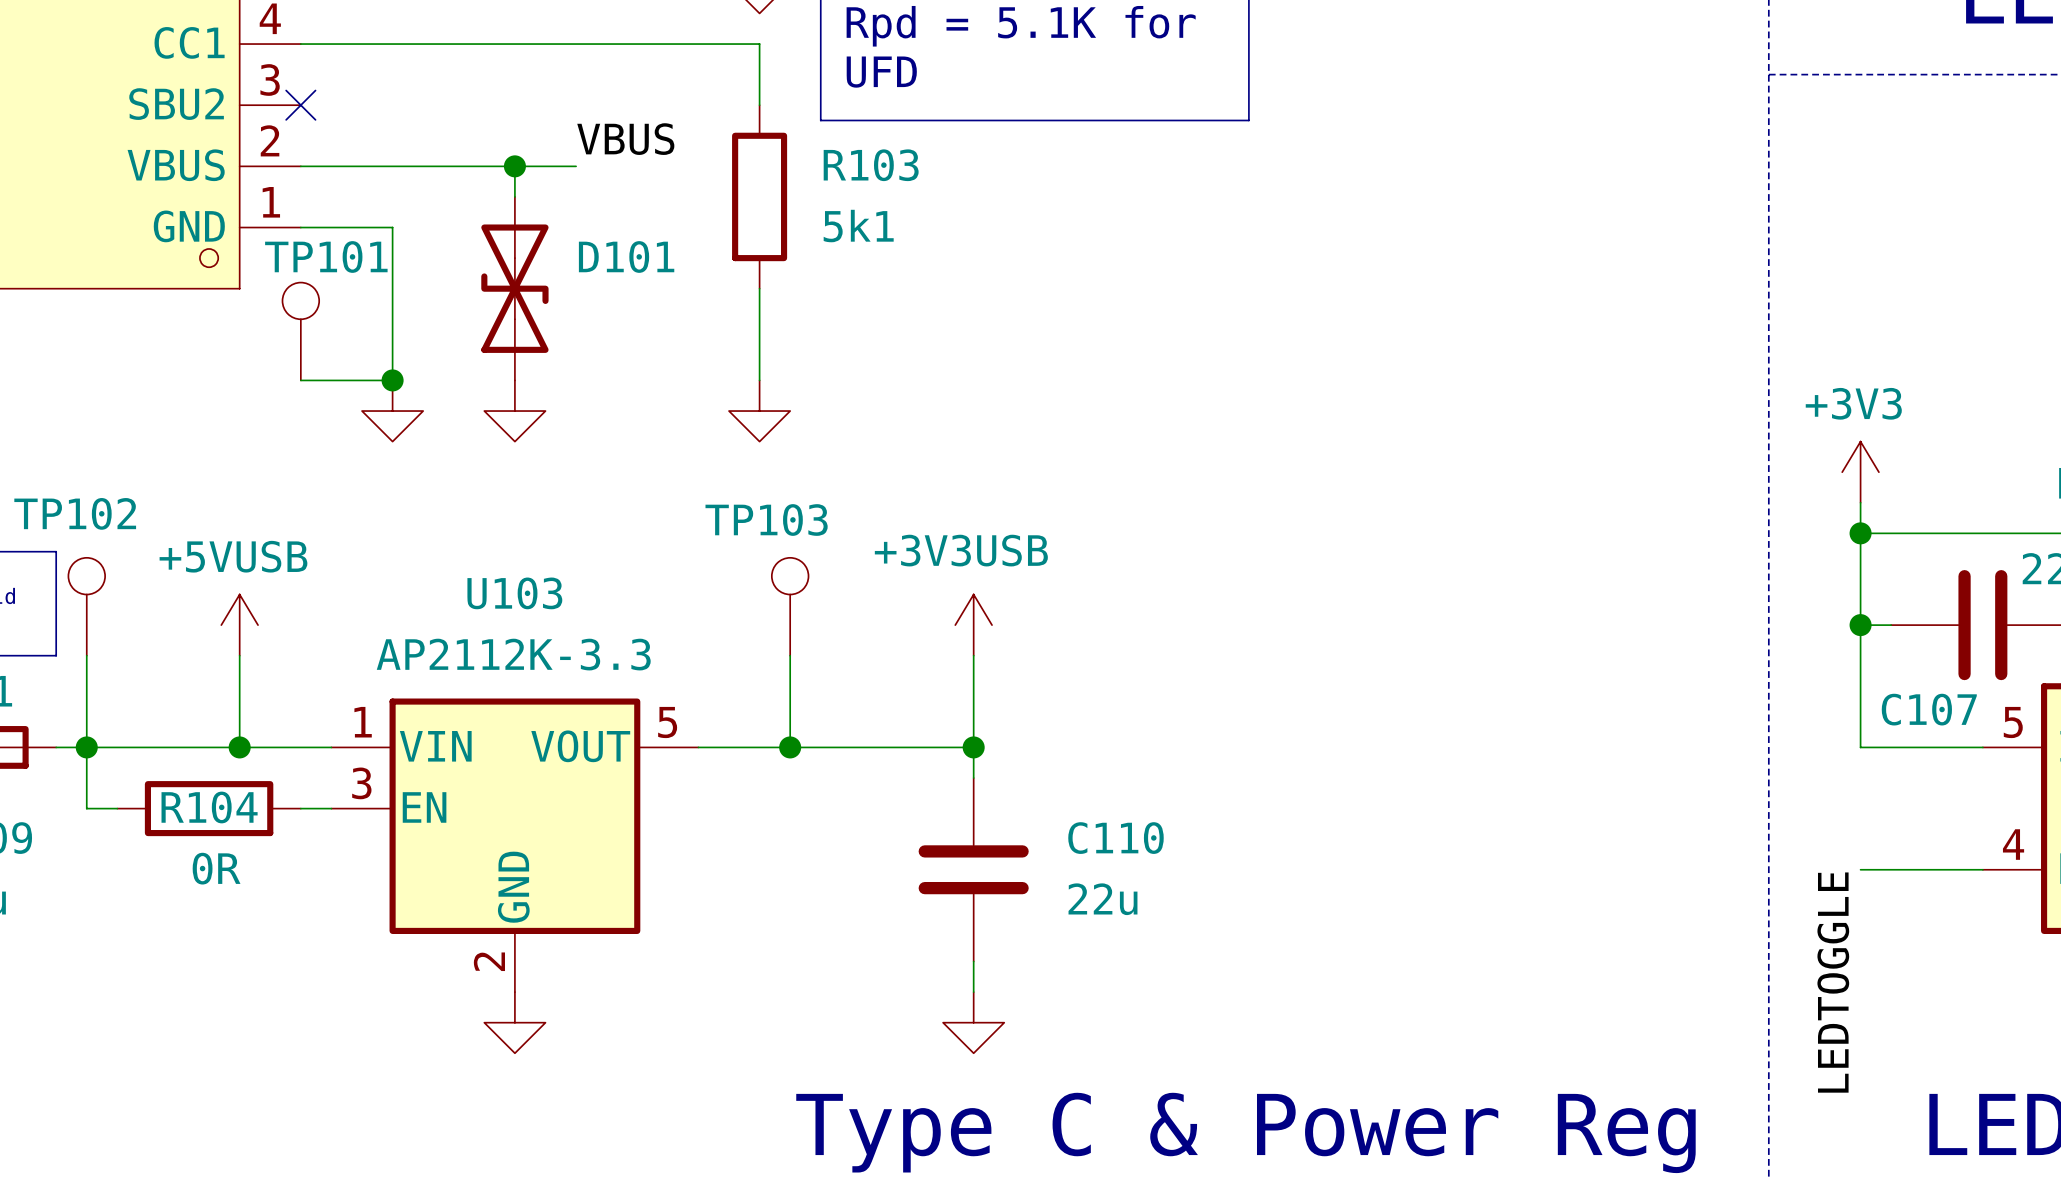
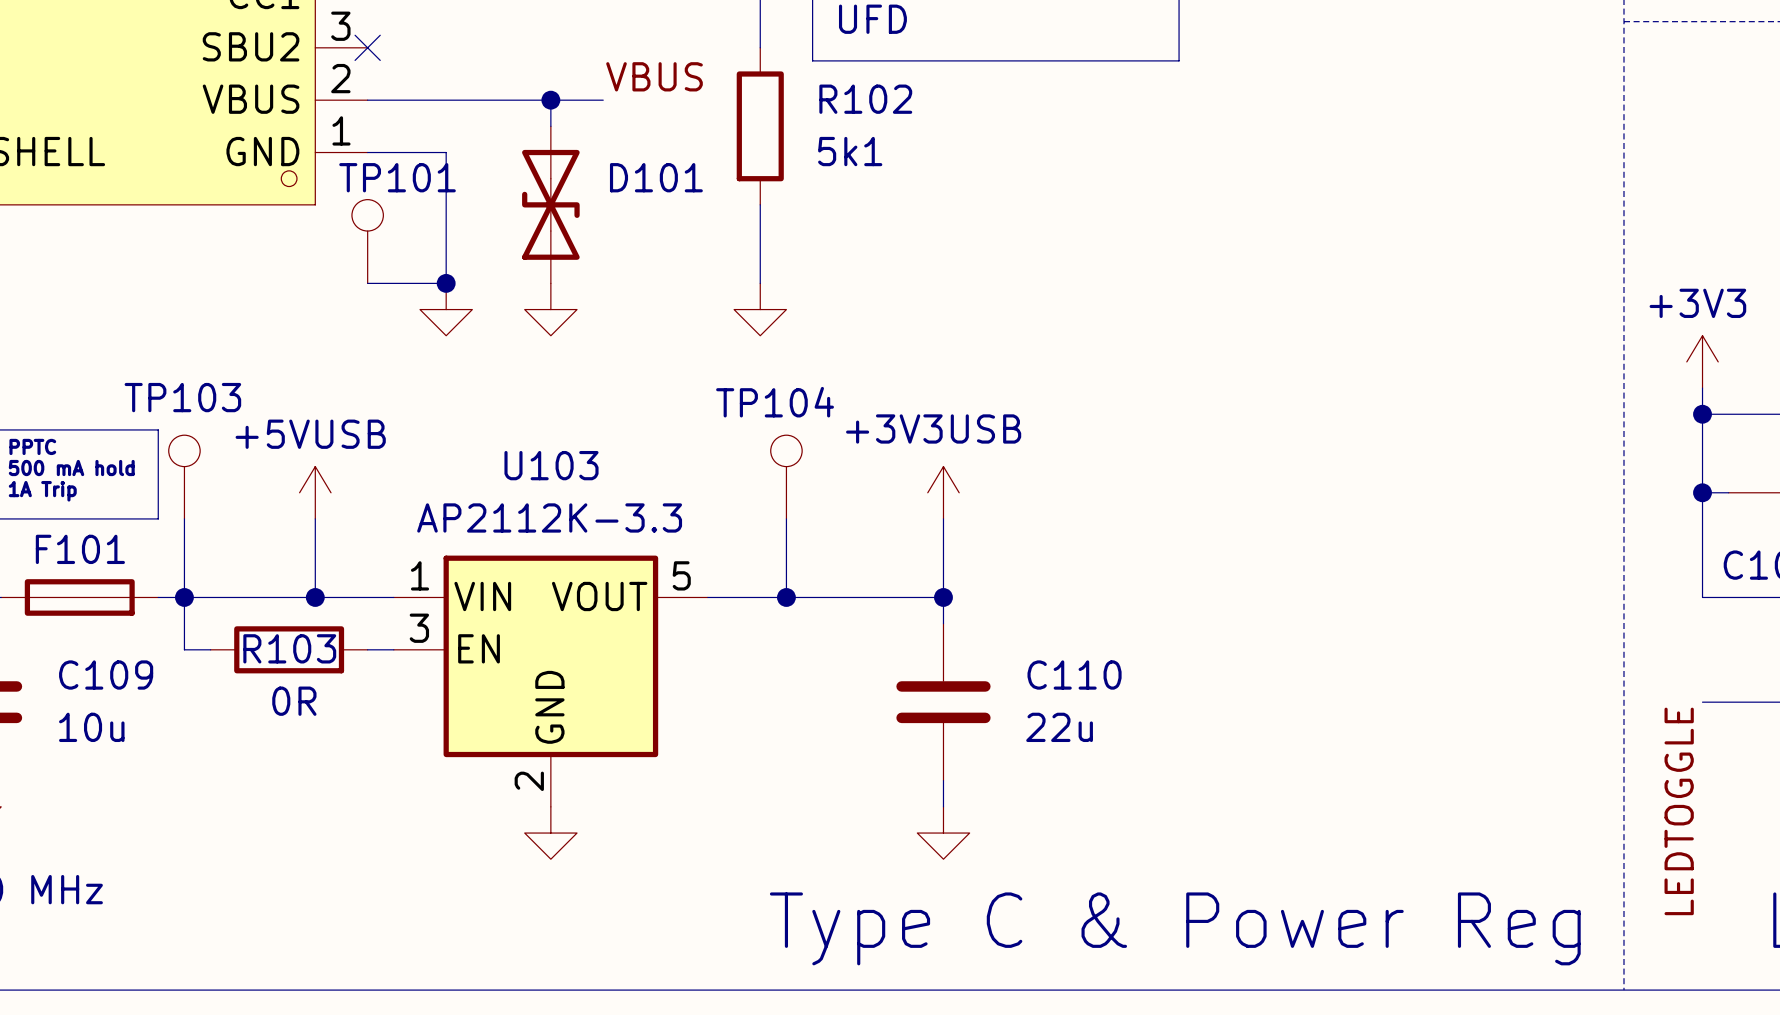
R103 name: R103 (871, 165) -> R102 (865, 99)
TP102 name: TP102 (75, 513) -> TP103 (182, 397)
TP103 name: TP103 (766, 520) -> TP104 (775, 402)
R104 name: R104 (209, 807) -> R103 (289, 648)

